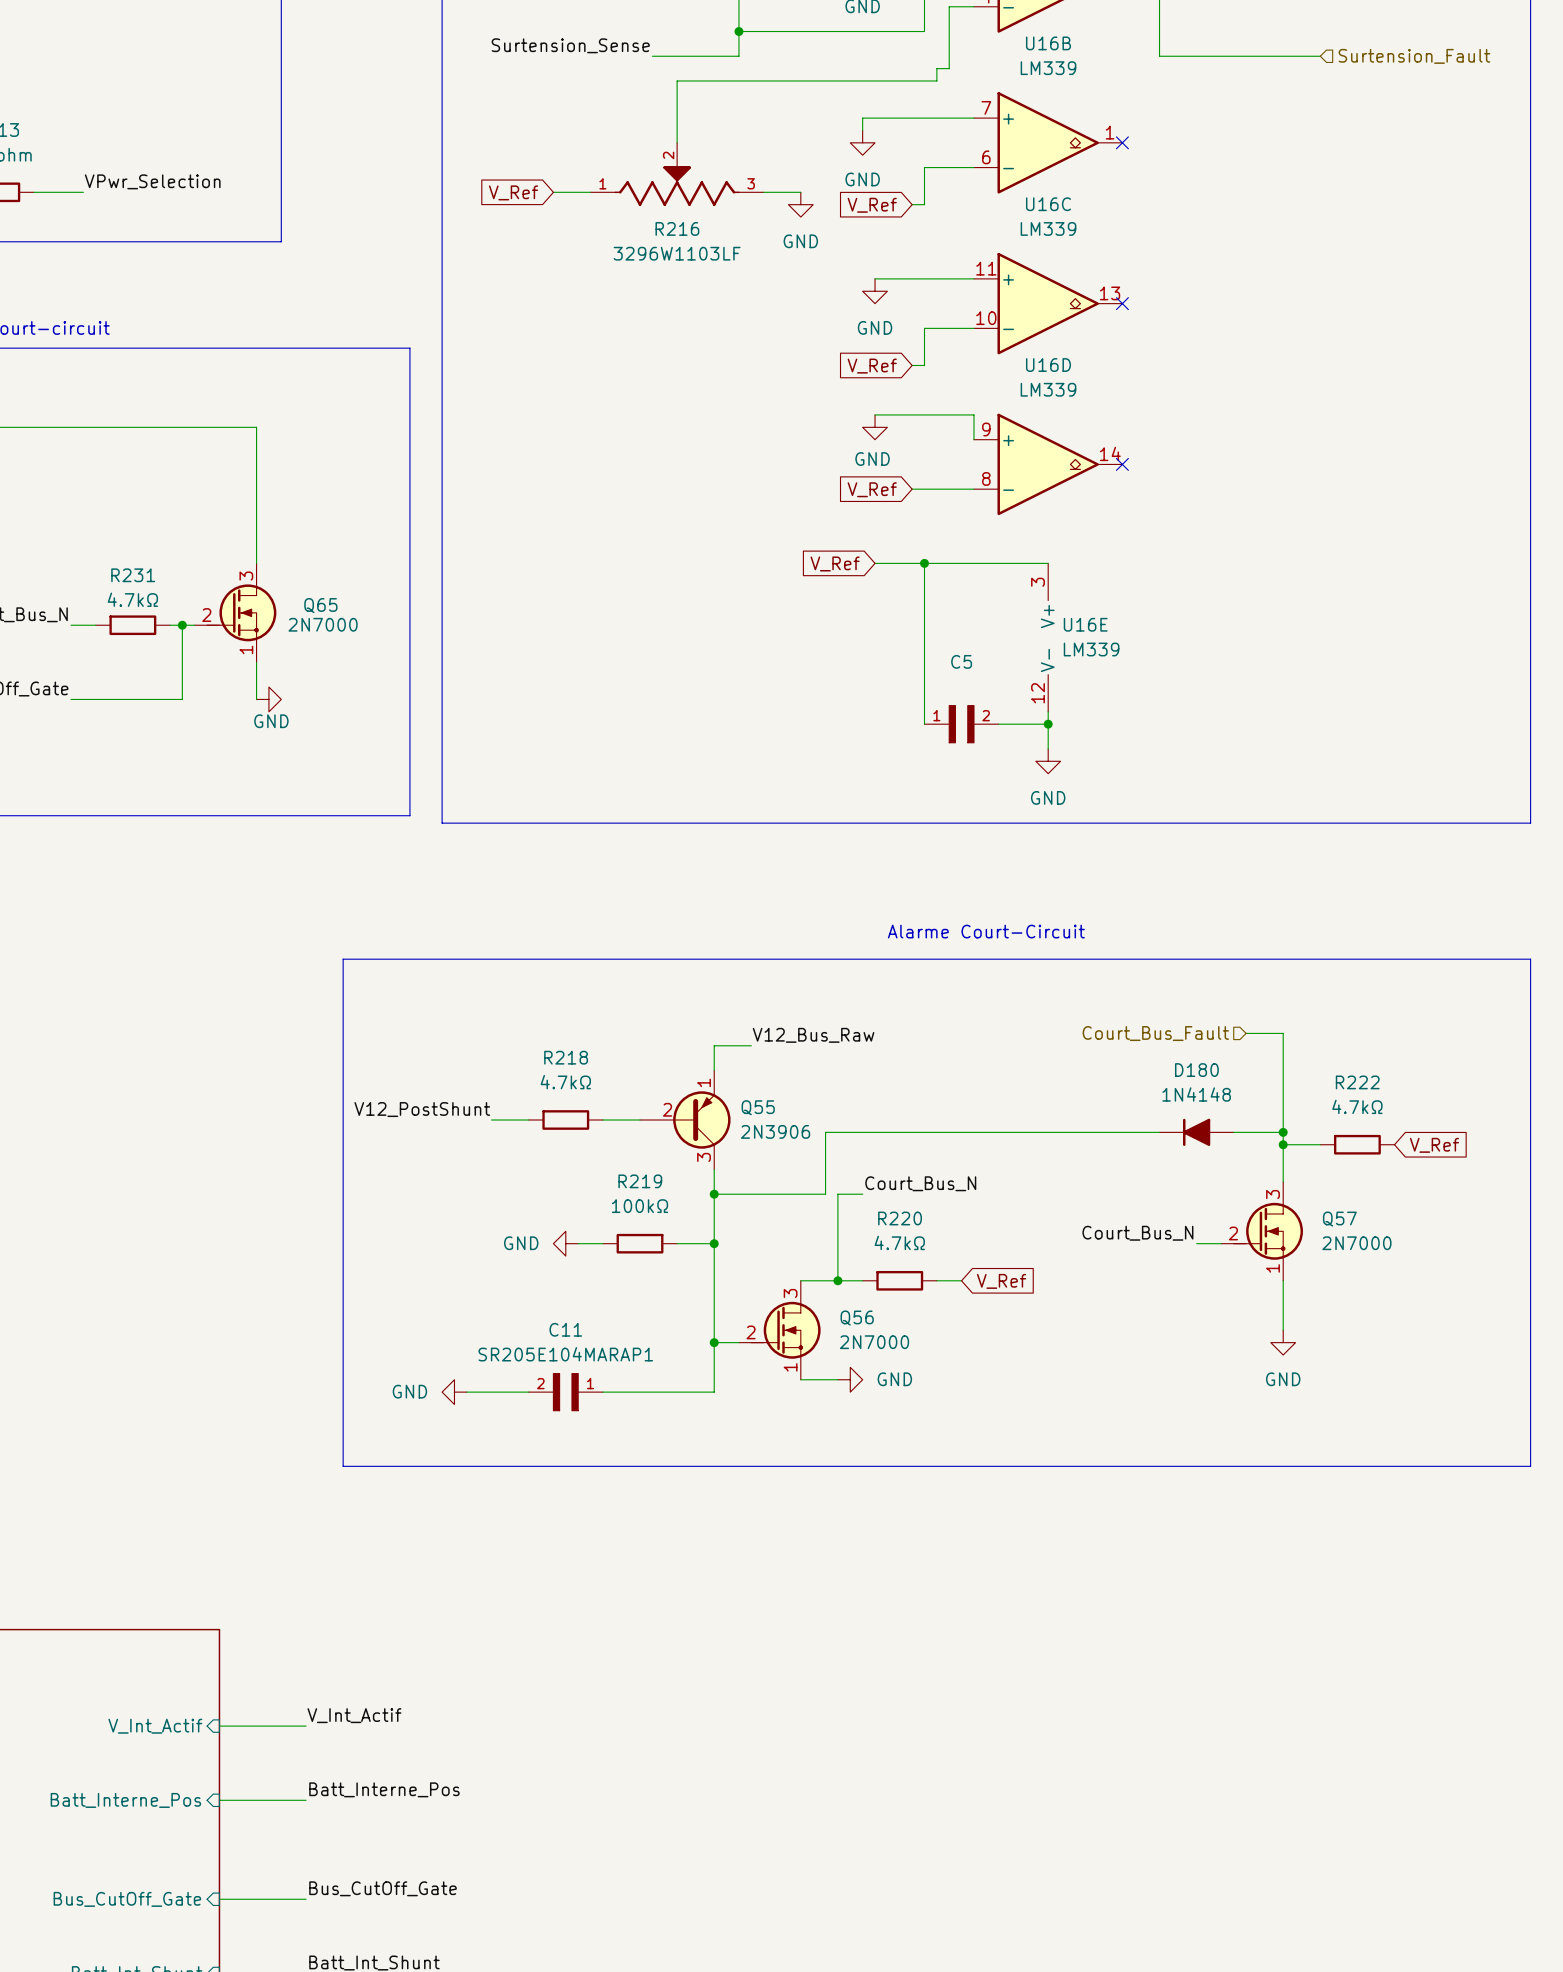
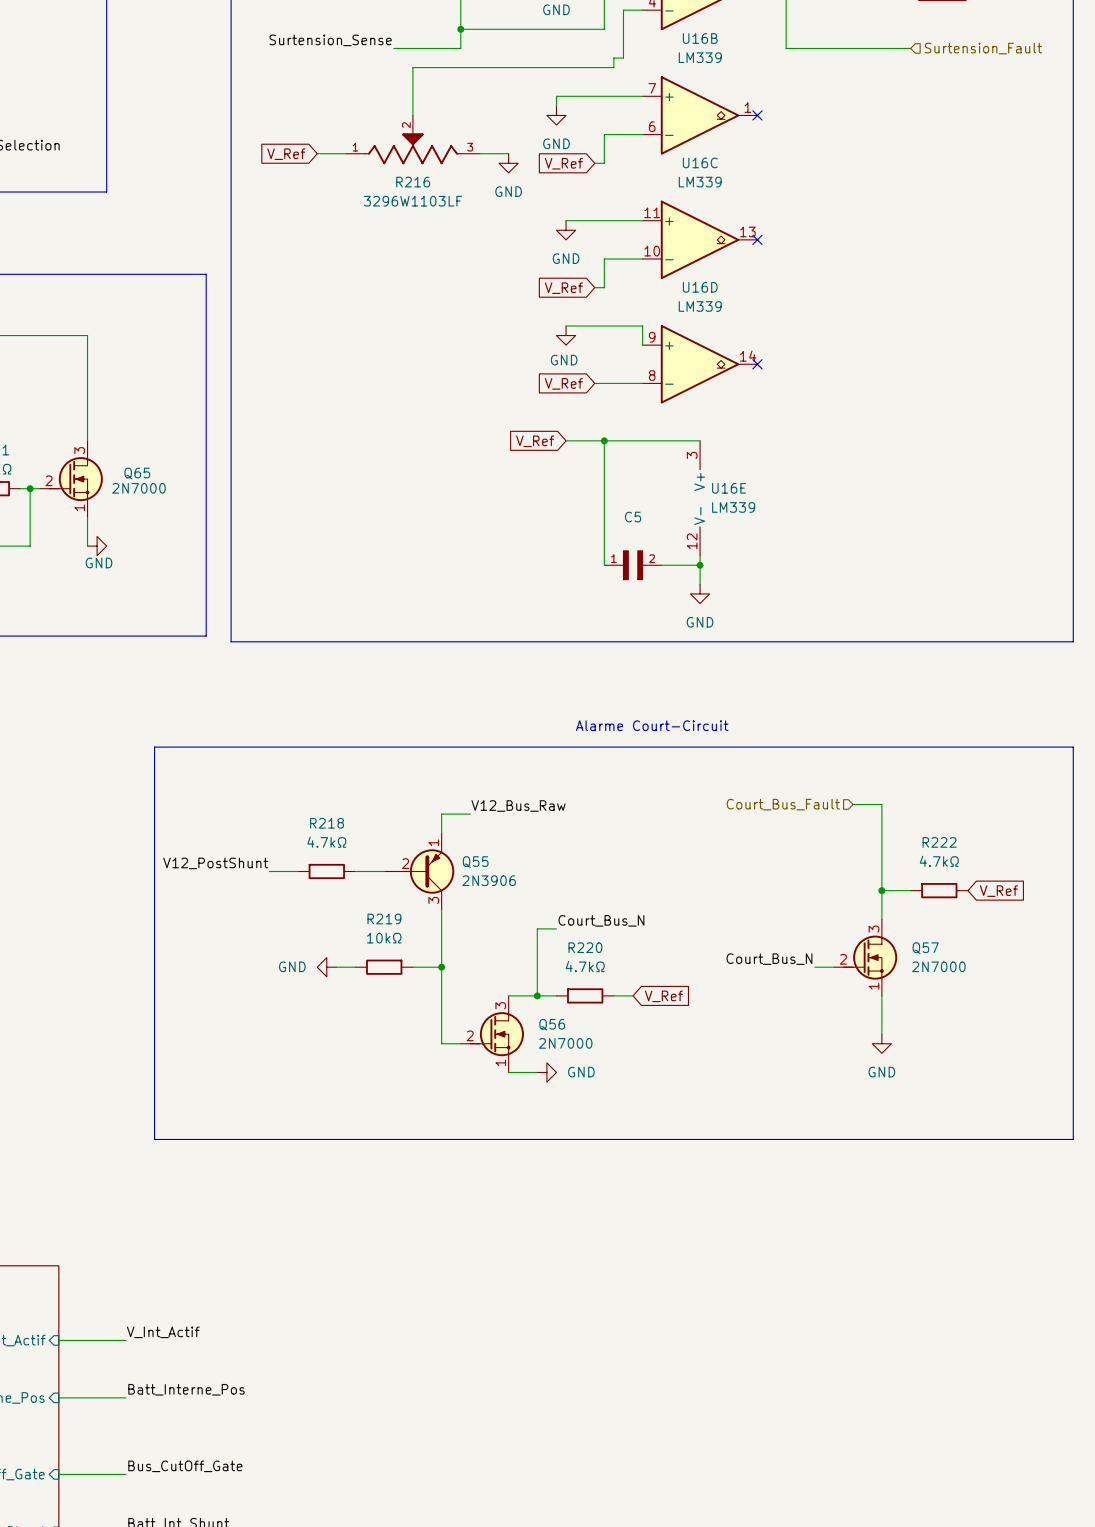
wire: (1159, 1132) (825, 1132) (825, 1194) (714, 1194) -> none
D180: 1N4148 (1196, 1132) -> none
wire: (1233, 1132) (1283, 1132) -> none
junction: (1283, 1132) -> none
junction: (714, 1194) -> none
R219 value: 100kΩ (640, 1206) -> 10kΩ (384, 938)
wire: (714, 1342) (714, 1392) (602, 1392) -> none
junction: (714, 1342) -> none
power symbol: GND (454, 1392) -> none
wire: (466, 1392) (528, 1392) -> none
C11: SR205E104MARAP1 (565, 1392) -> none

